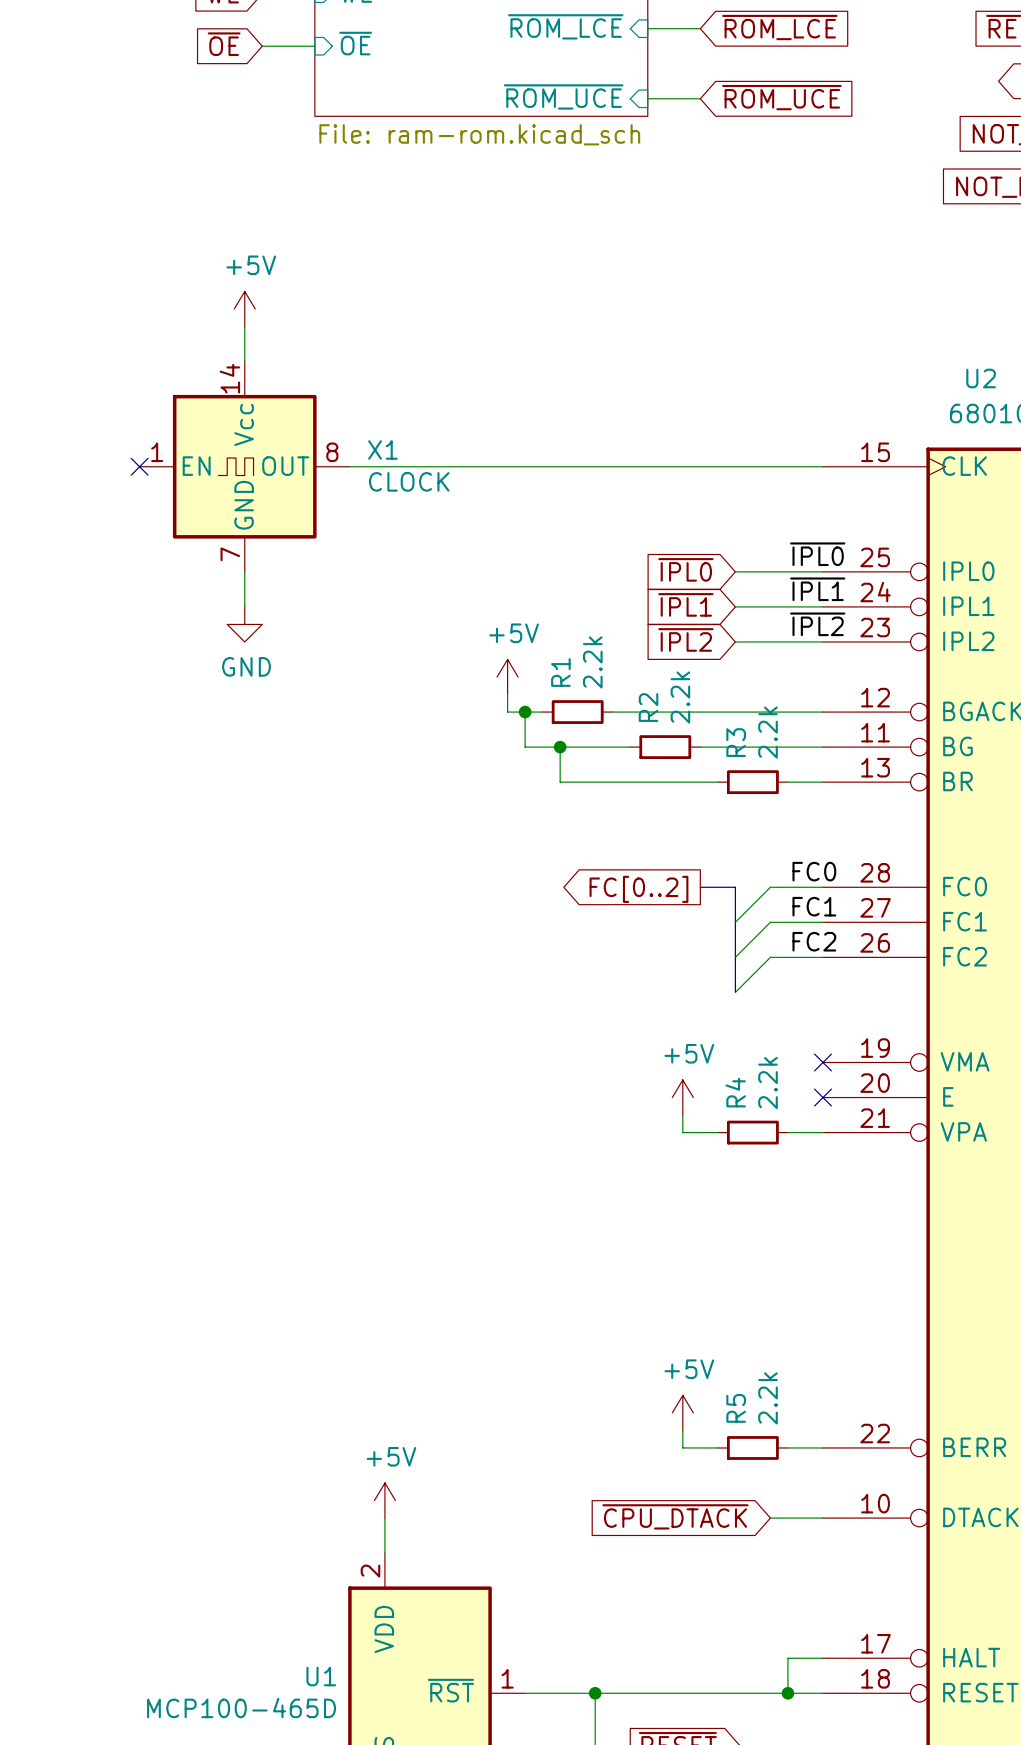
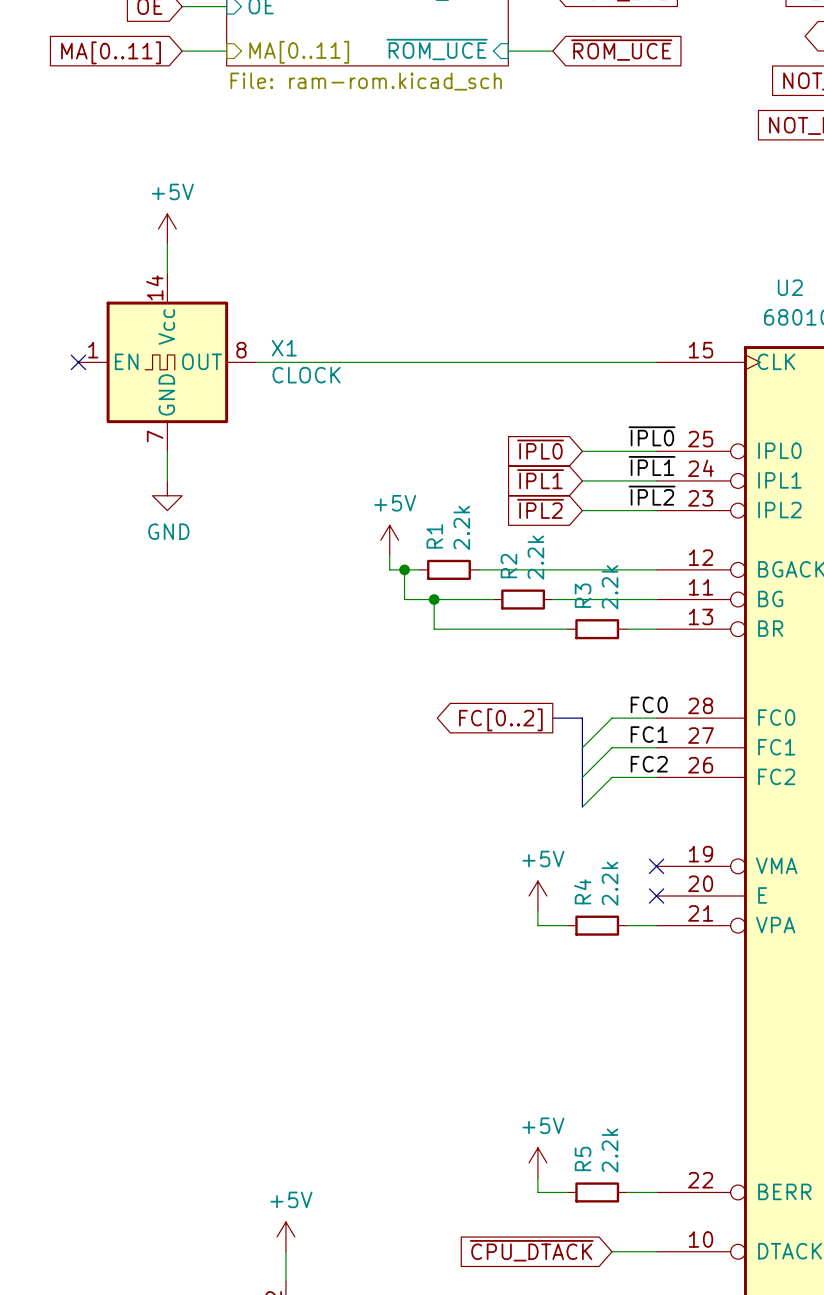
wire: none -> (182, 51) (226, 51)
global label: none -> MA[0..11] (111, 52)
hierarchical label: none -> MA[0..11] (299, 52)

